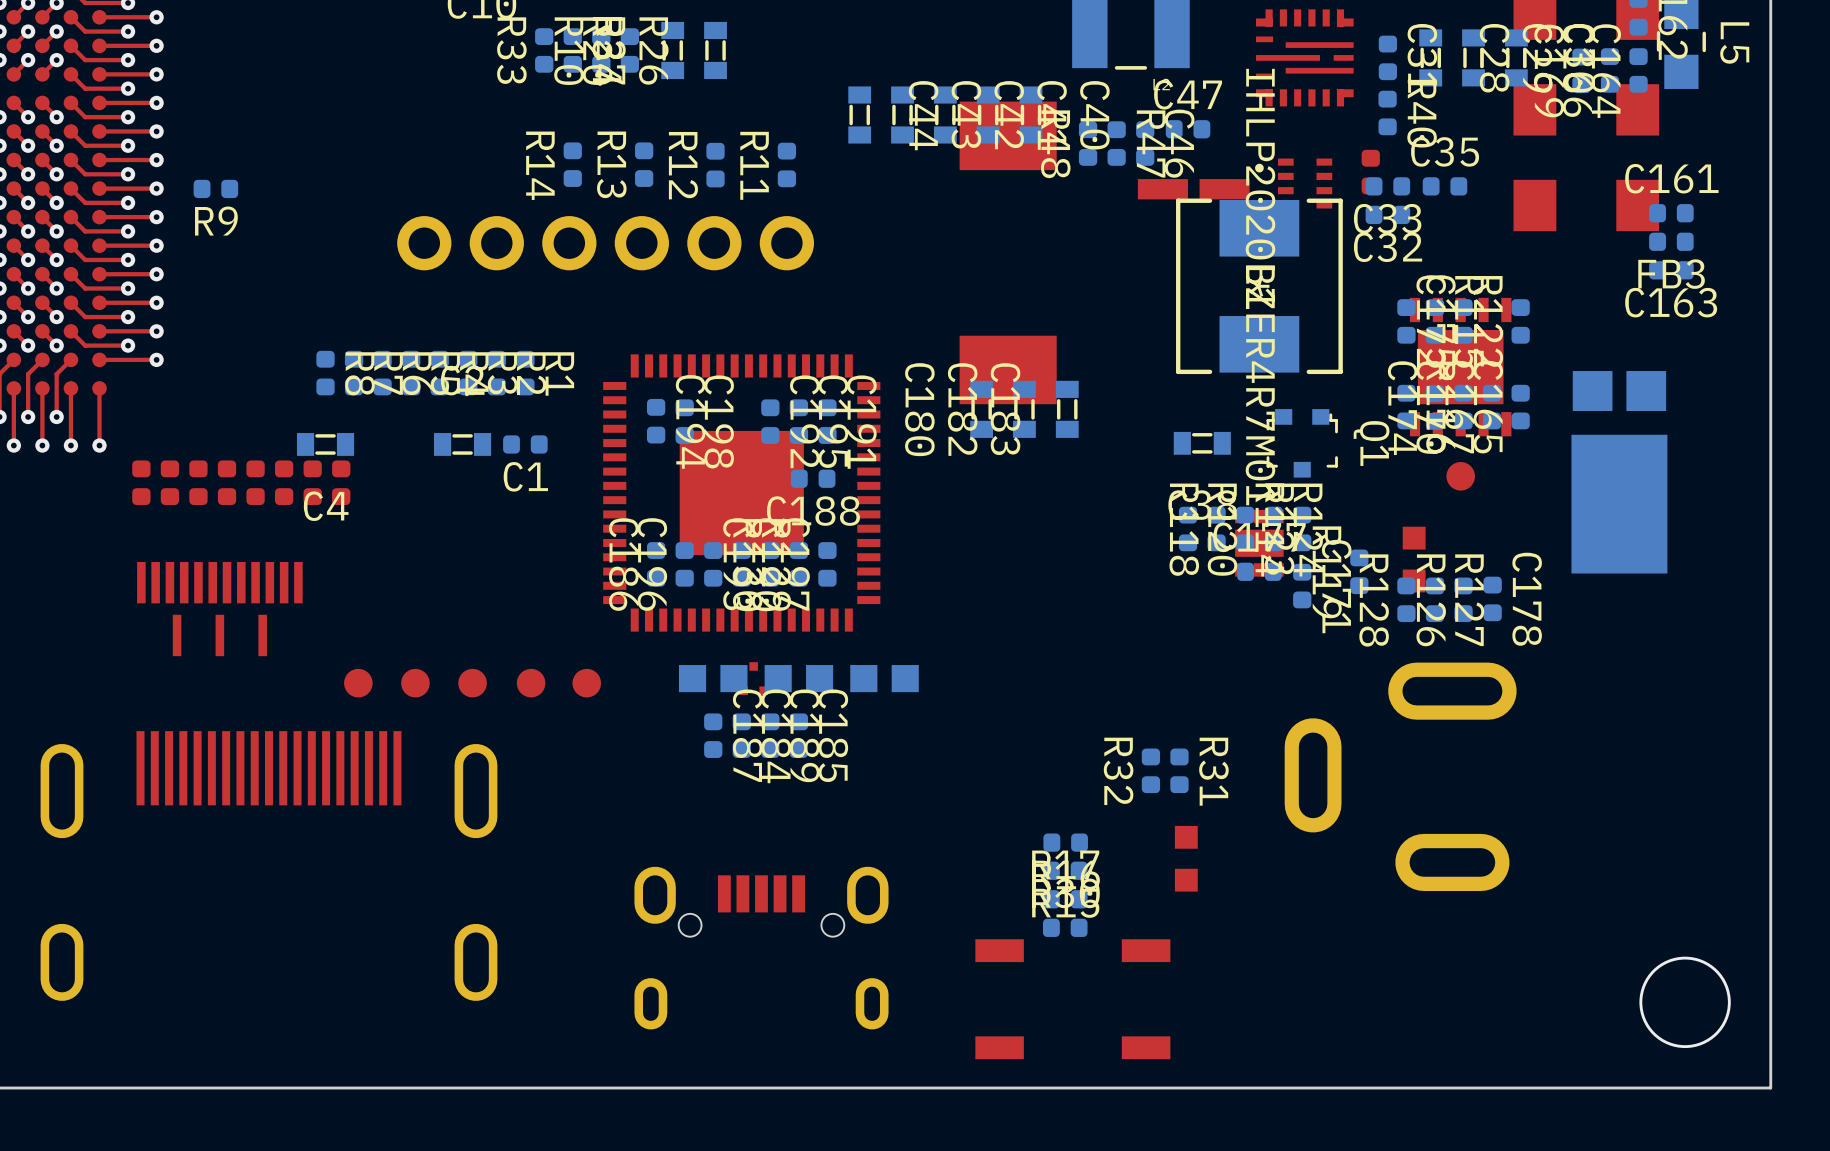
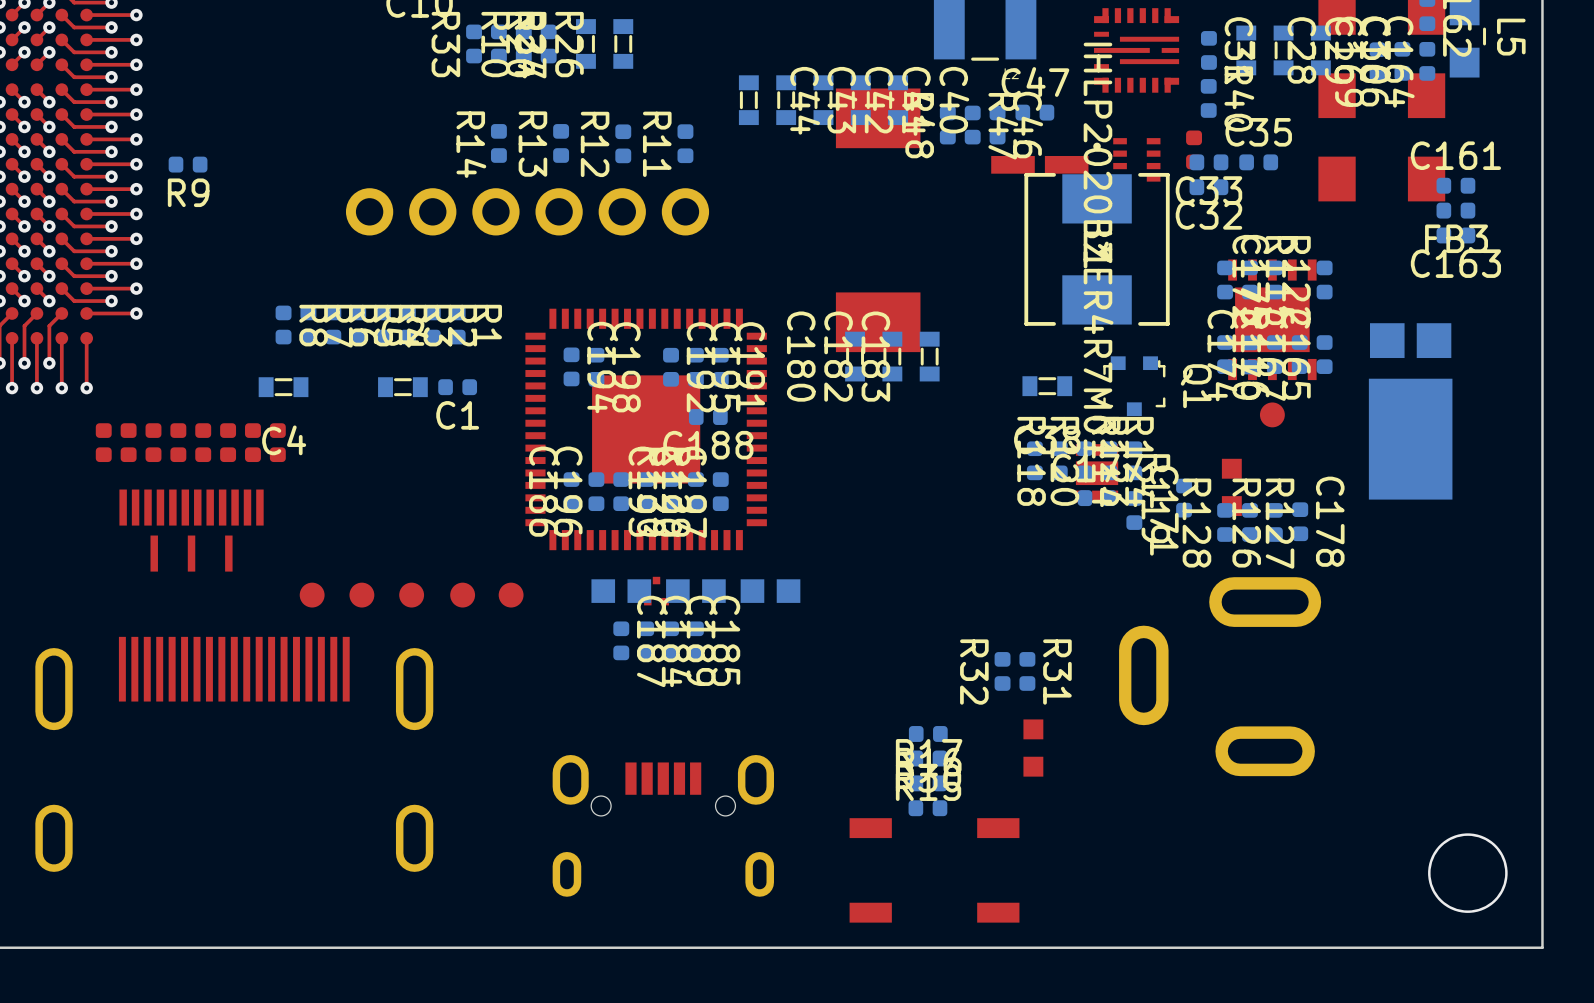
part: (141, 482) -> none
part: (169, 482) -> none
part: (198, 482) -> none
part: (227, 482) -> none
part: (255, 482) -> none
part: (284, 482) -> none
part: (312, 482) -> none
part: (341, 482) -> none
part: none -> (103, 442)
part: none -> (128, 442)
part: none -> (153, 442)
part: none -> (178, 442)
part: none -> (203, 442)
part: none -> (228, 442)
part: none -> (252, 442)
part: none -> (277, 442)

